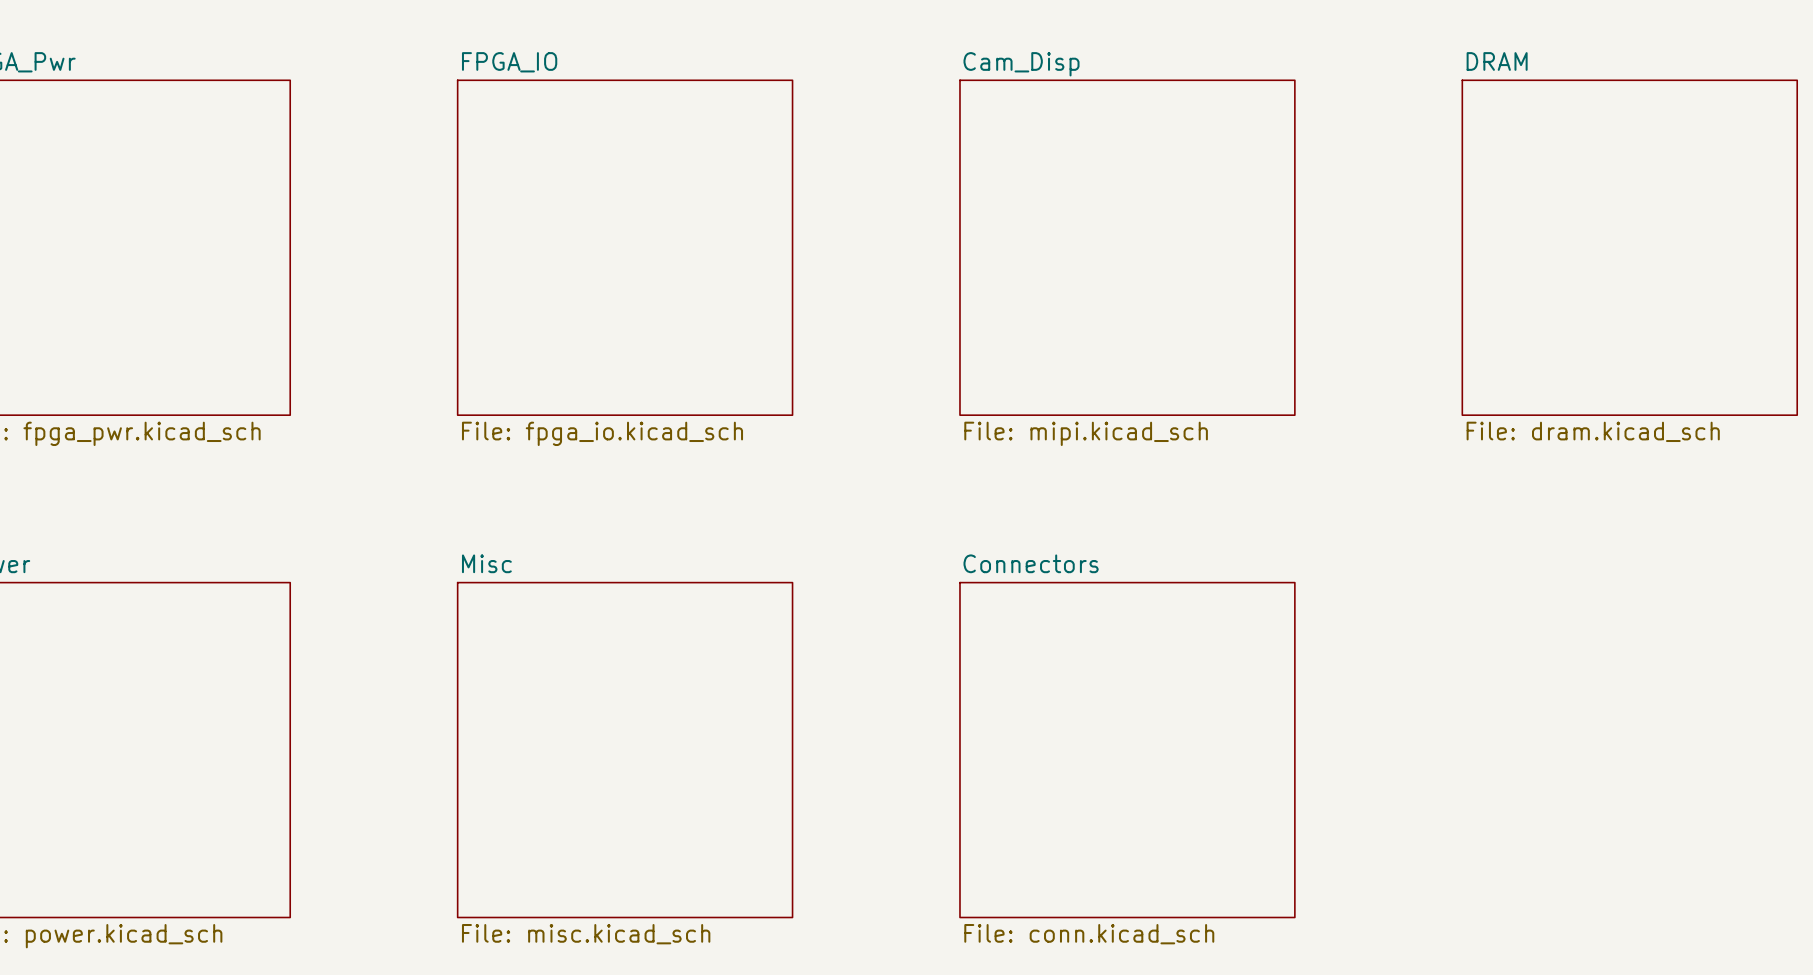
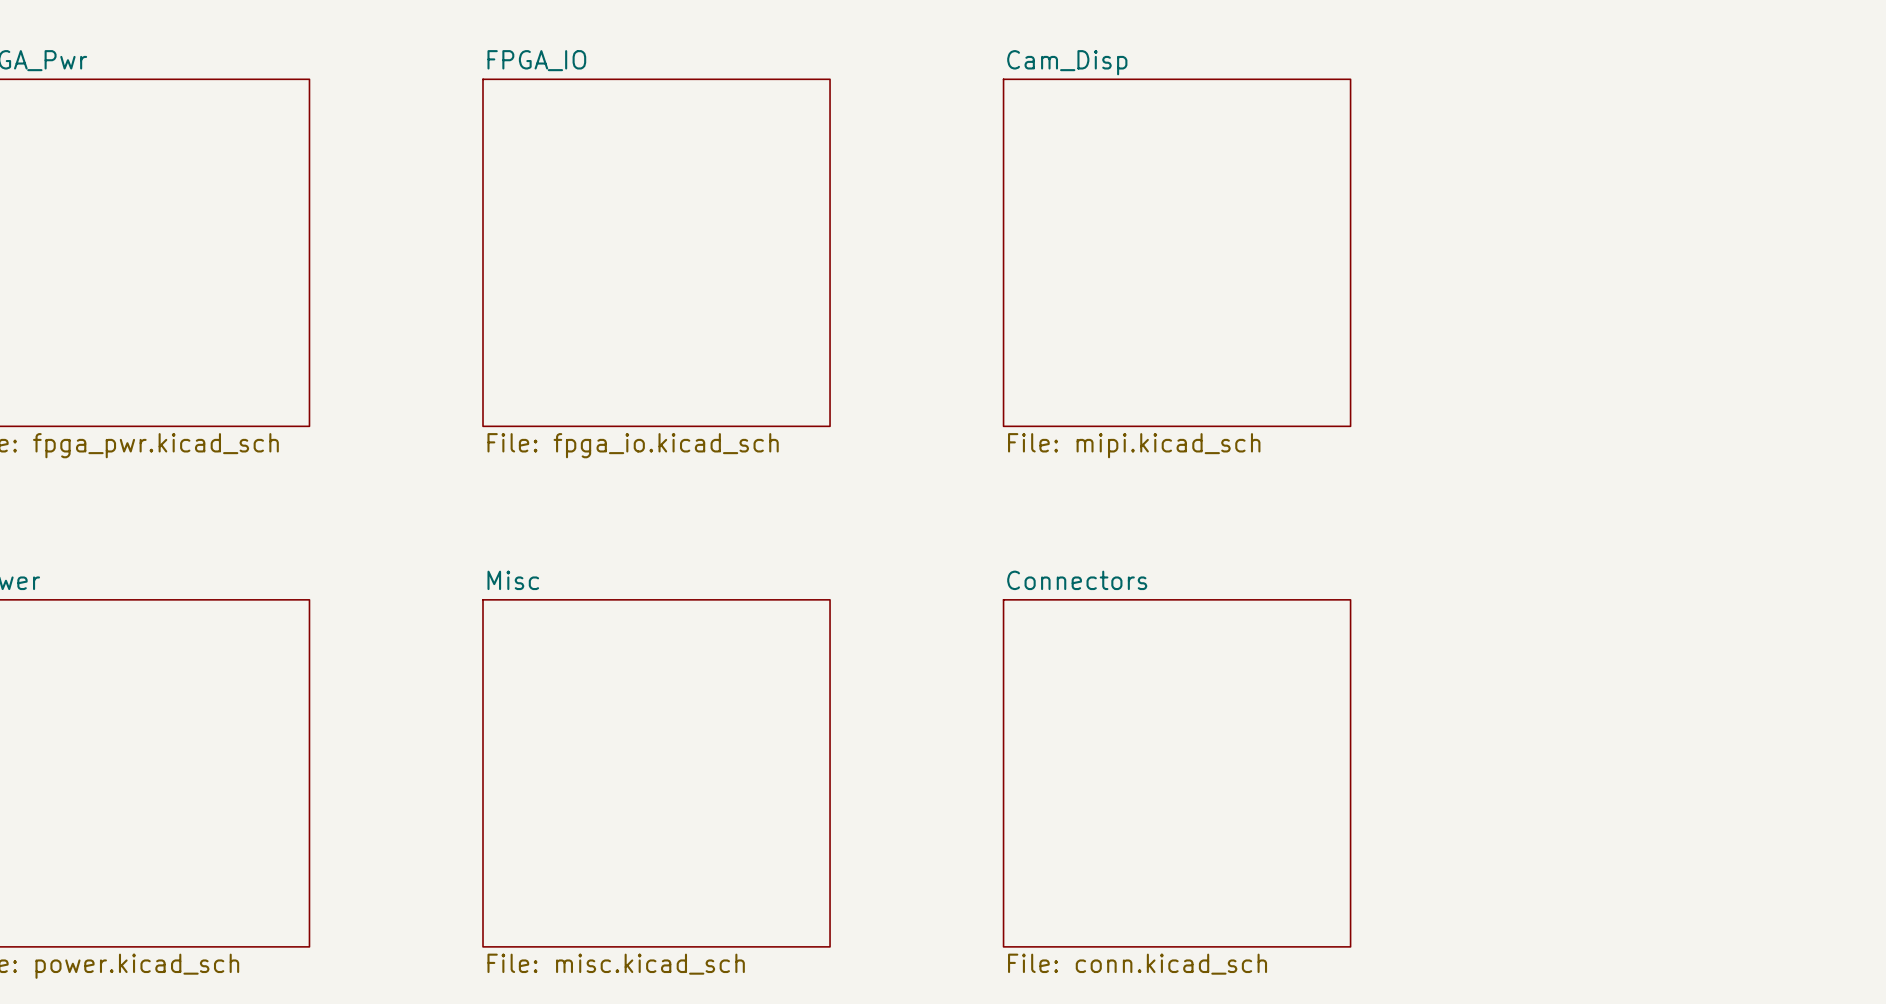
sheet DRAM: File: dram.kicad_sch (1629, 247) -> none

